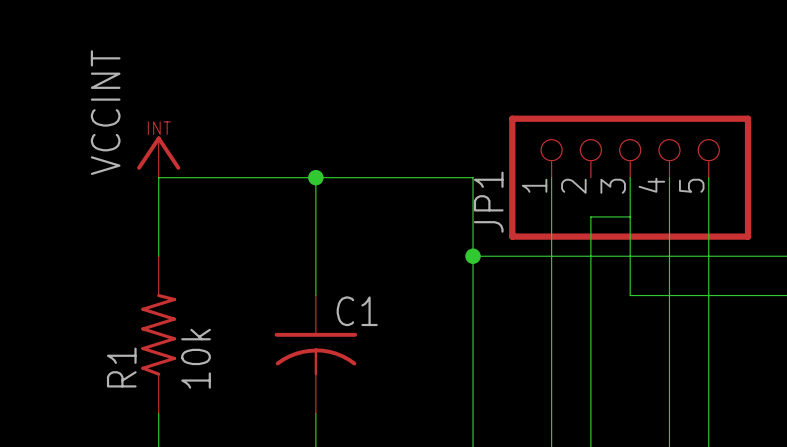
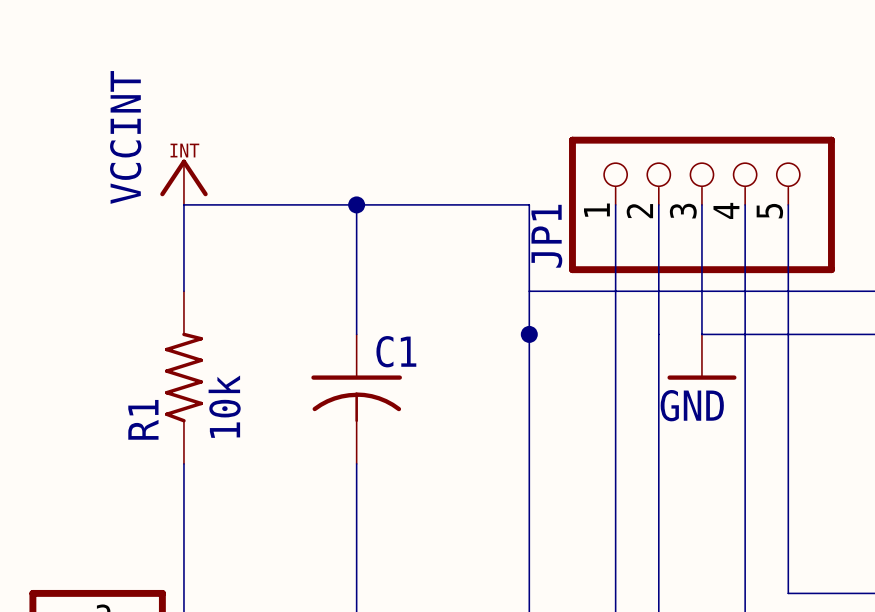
wire: (590, 216) (630, 216) -> (658, 248) (658, 204)
junction position: (473, 256) -> (529, 334)
power symbol: none -> GND (701, 357)

